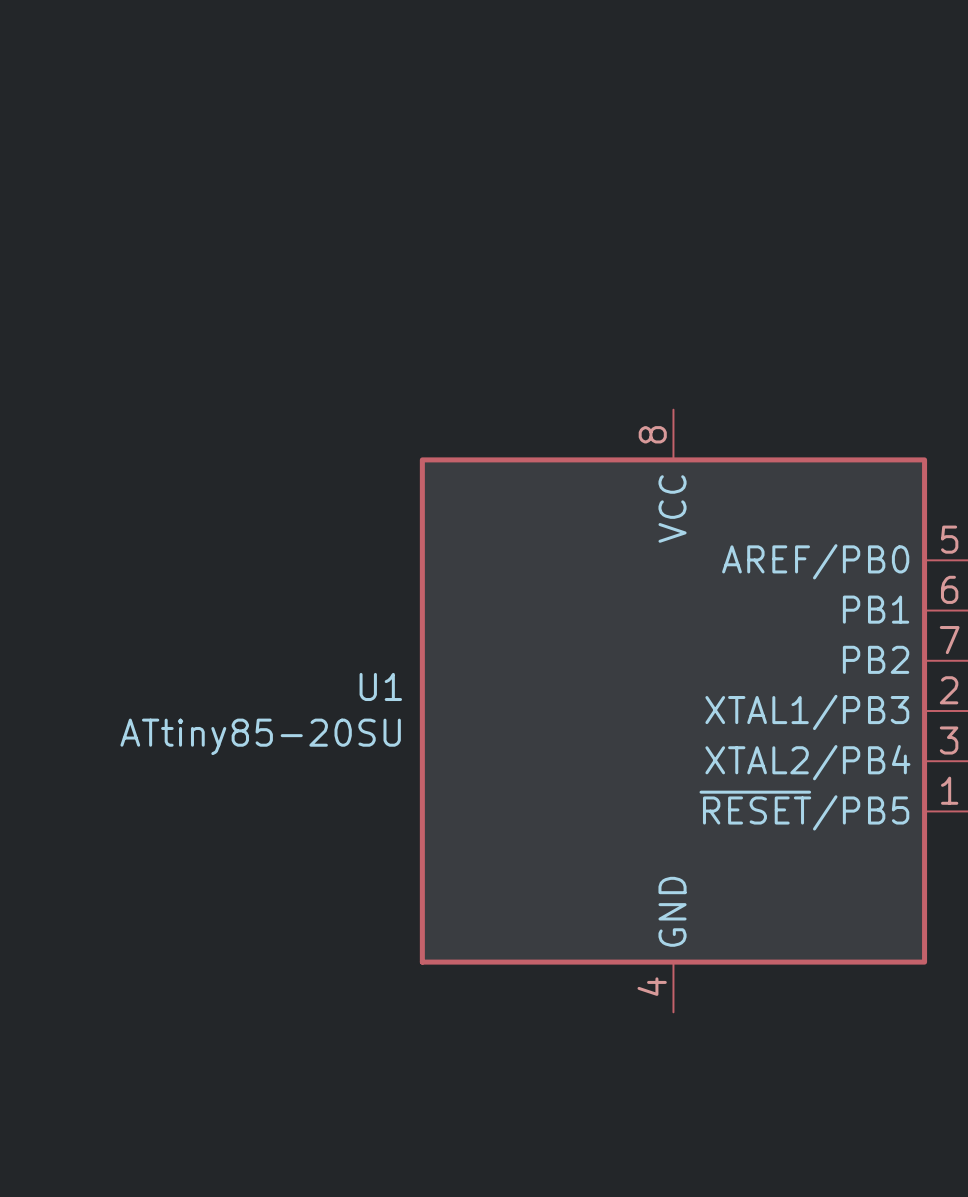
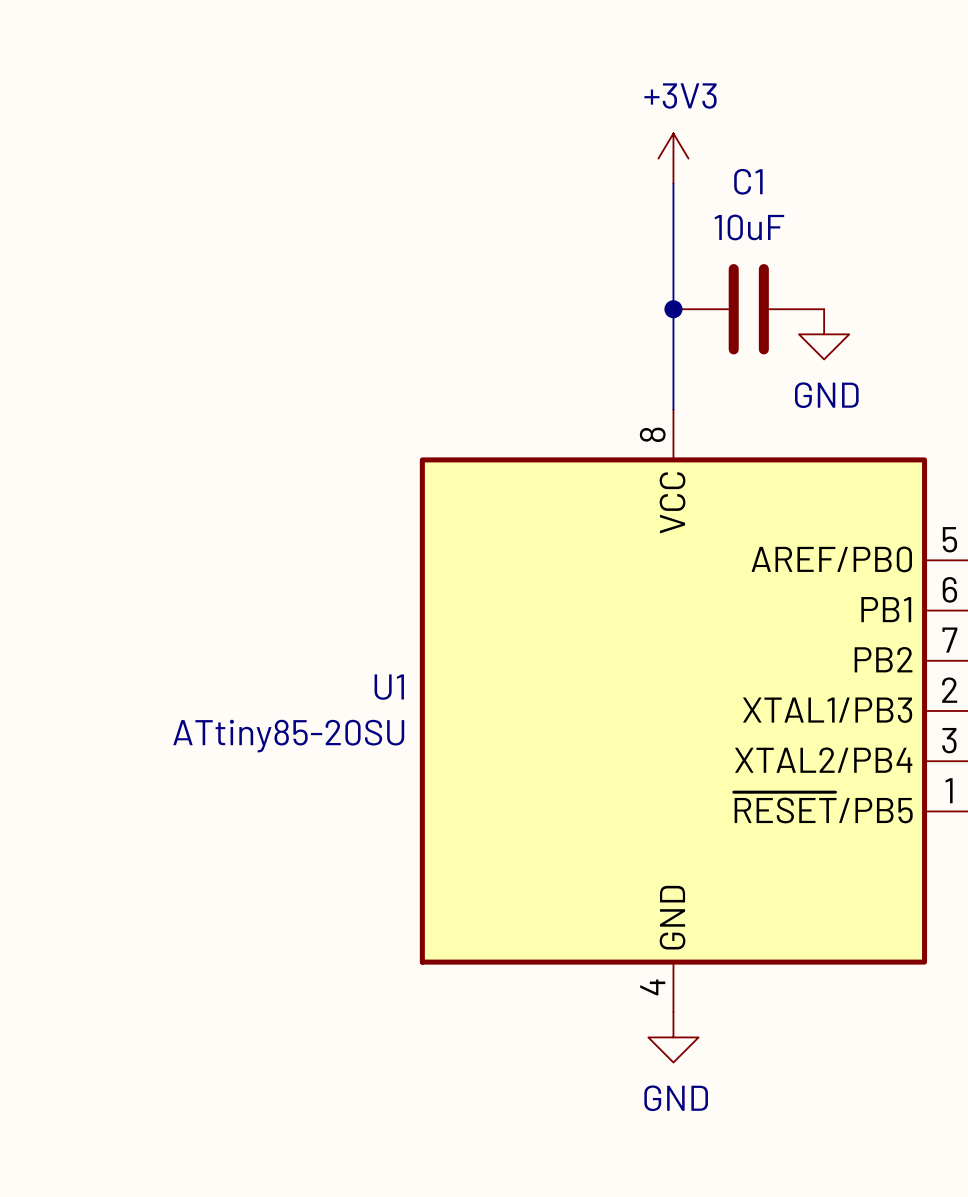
power symbol: none -> +3V3 (673, 158)
wire: none -> (673, 183) (673, 409)
junction: none -> (673, 309)
C1: none -> 10uF (748, 309)
power symbol: none -> GND (824, 334)
power symbol: none -> GND (673, 1037)

